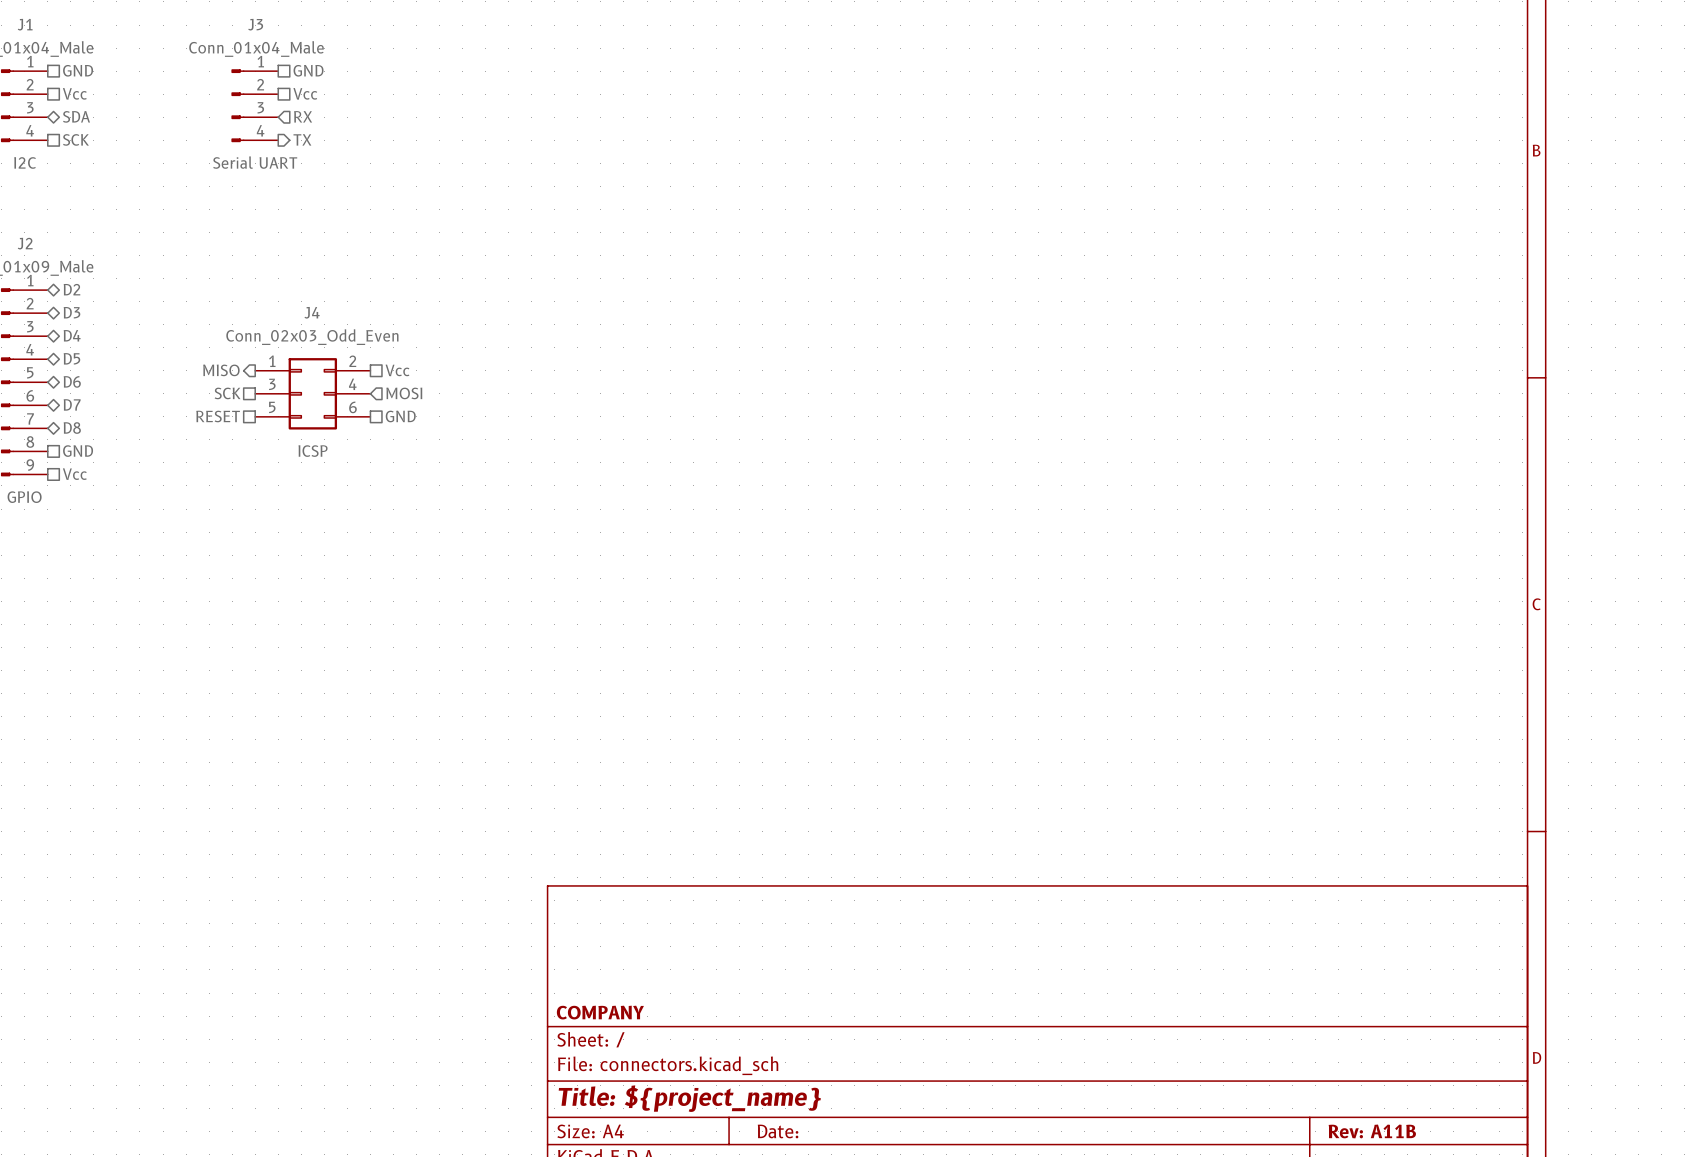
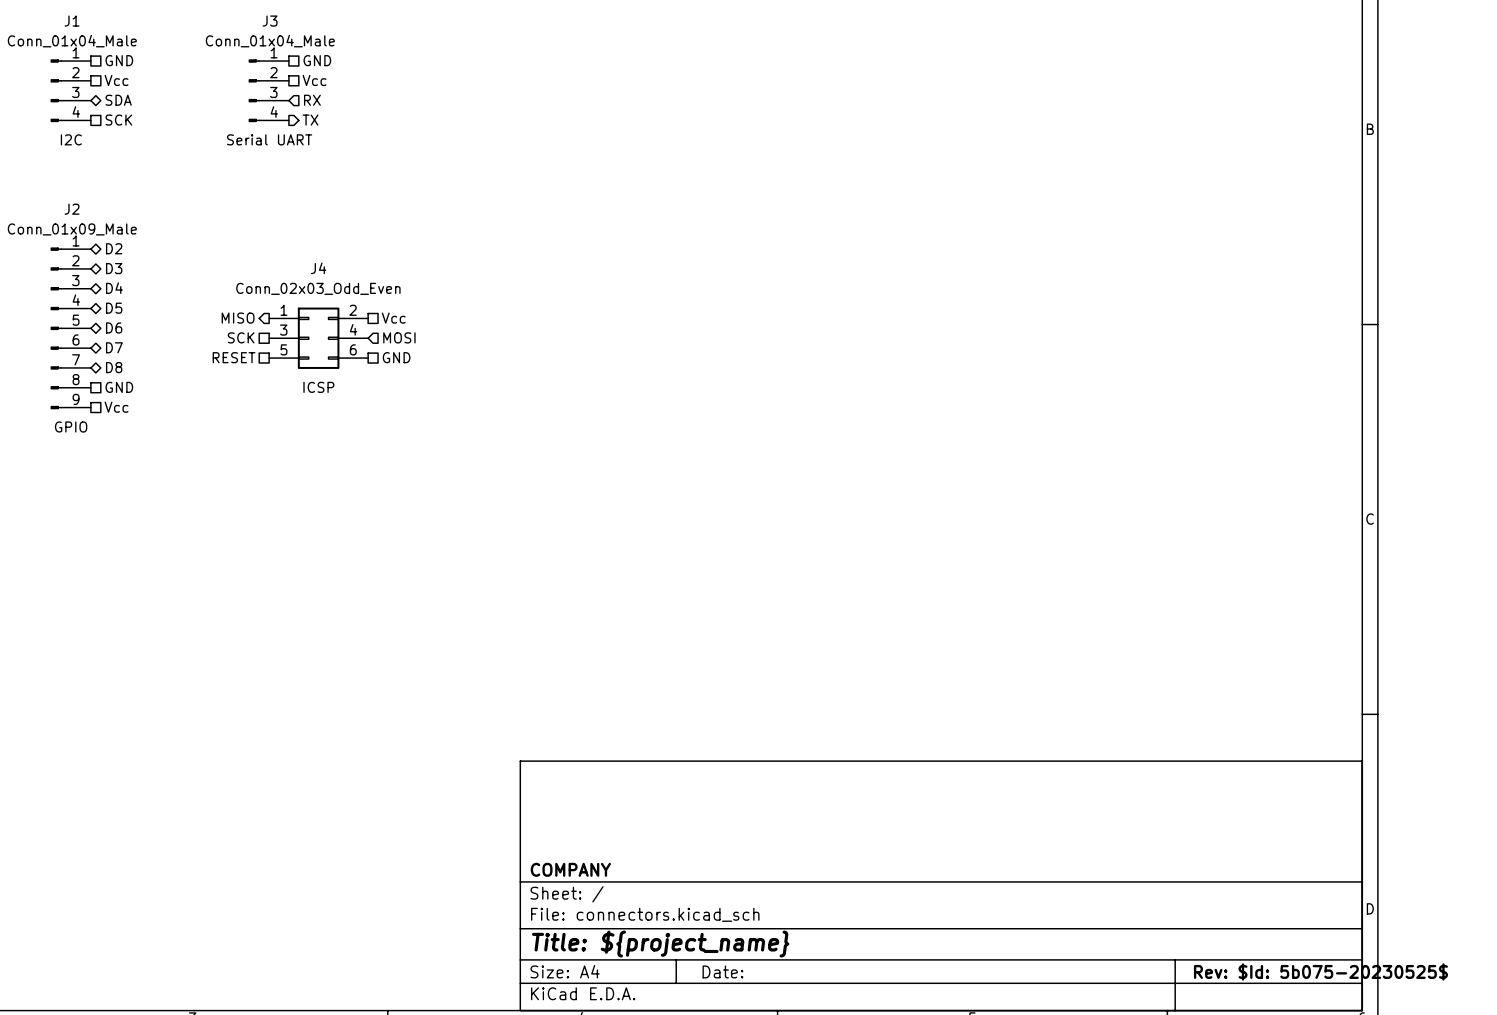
title block: Rev: A11B (1372, 1131) -> Rev: $Id: 5b075-20230525$ (1320, 971)

